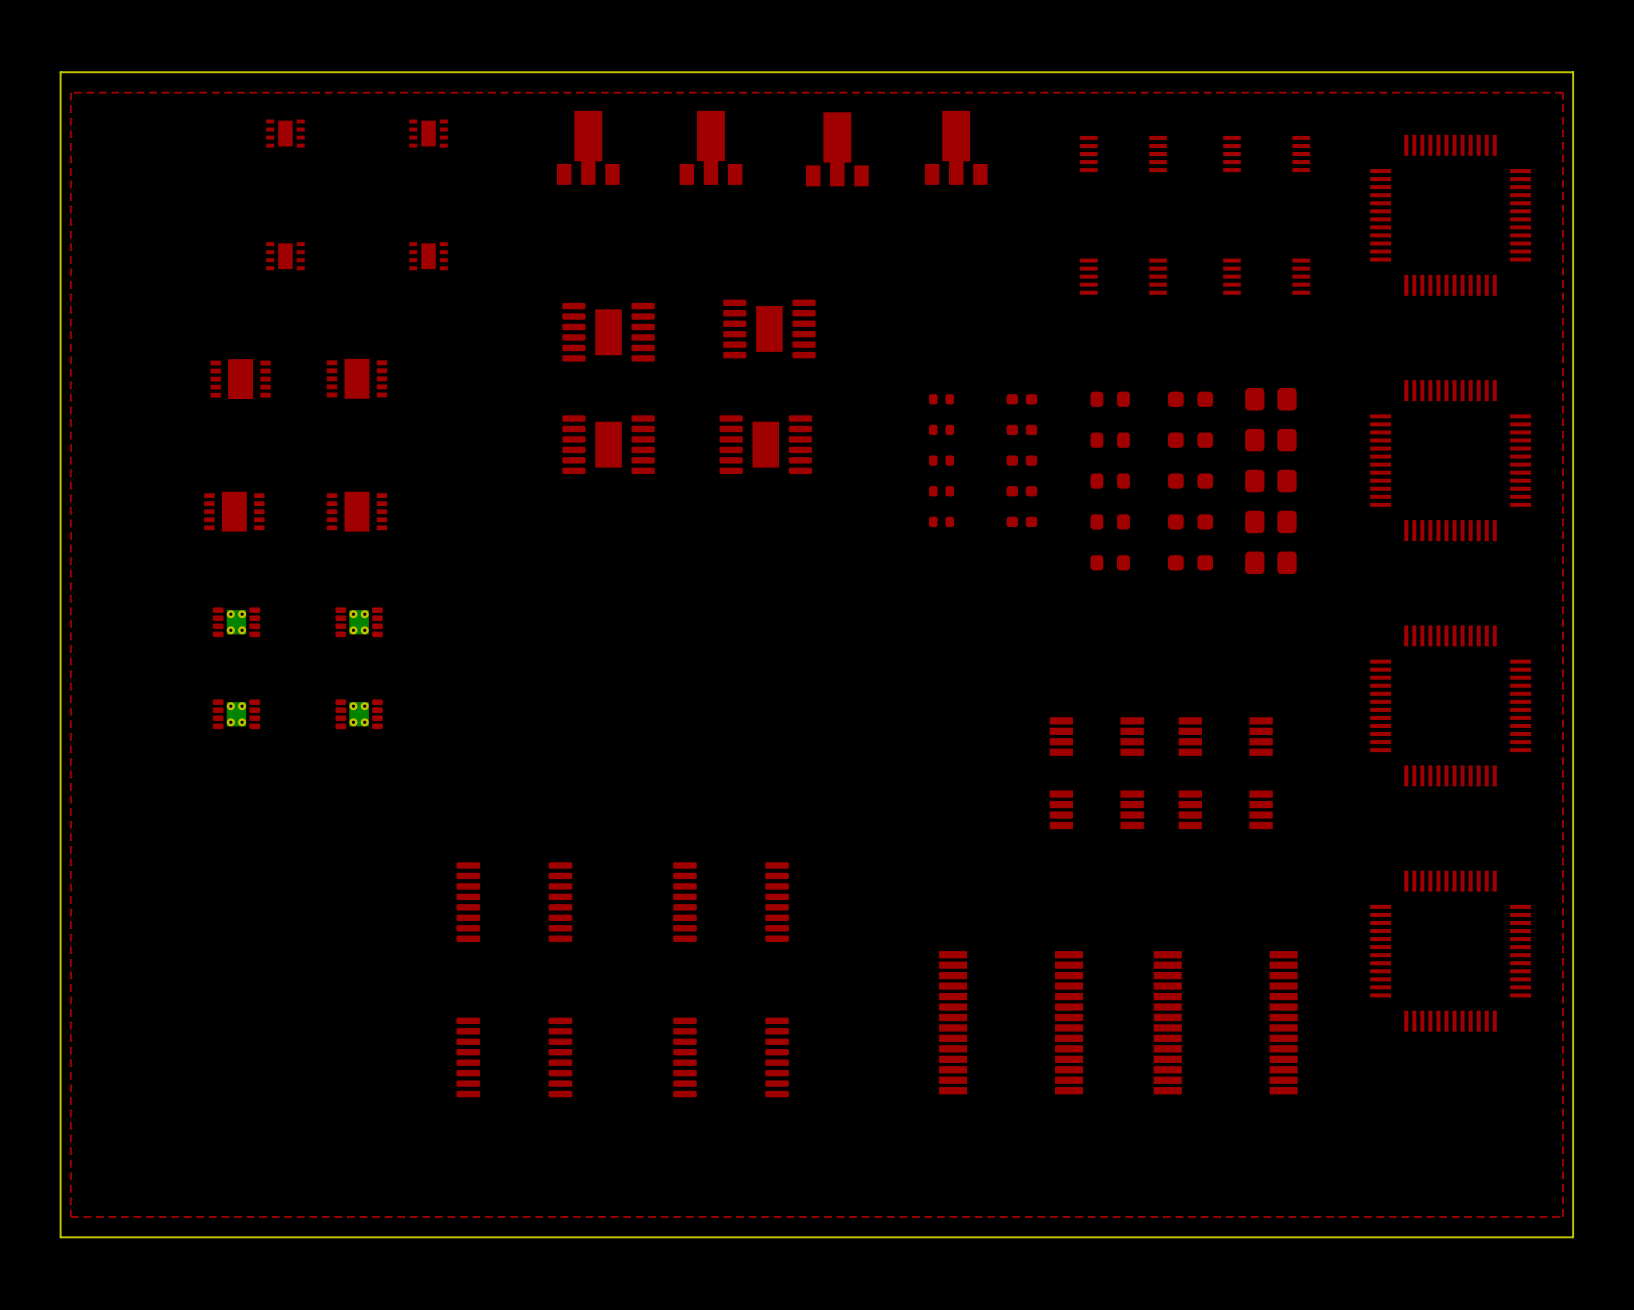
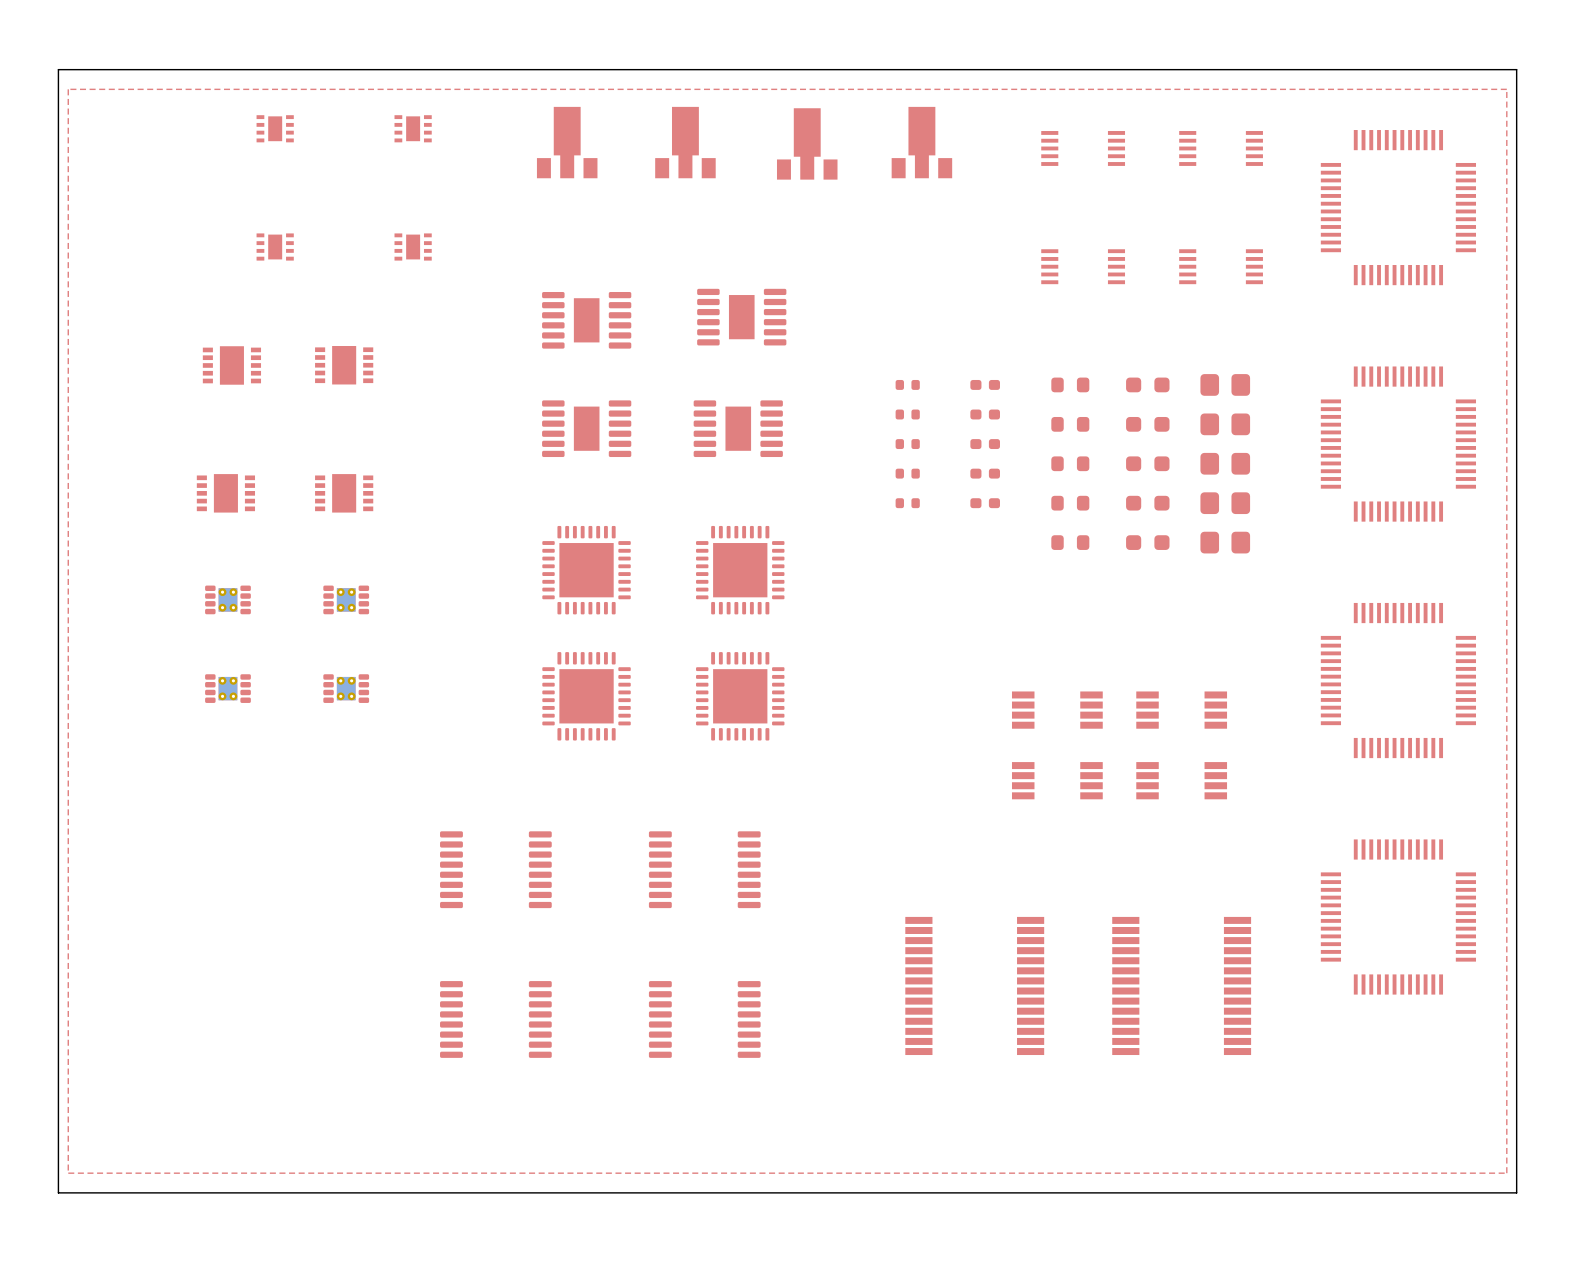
part: none -> (586, 570)
part: none -> (740, 570)
part: none -> (586, 696)
part: none -> (740, 696)

